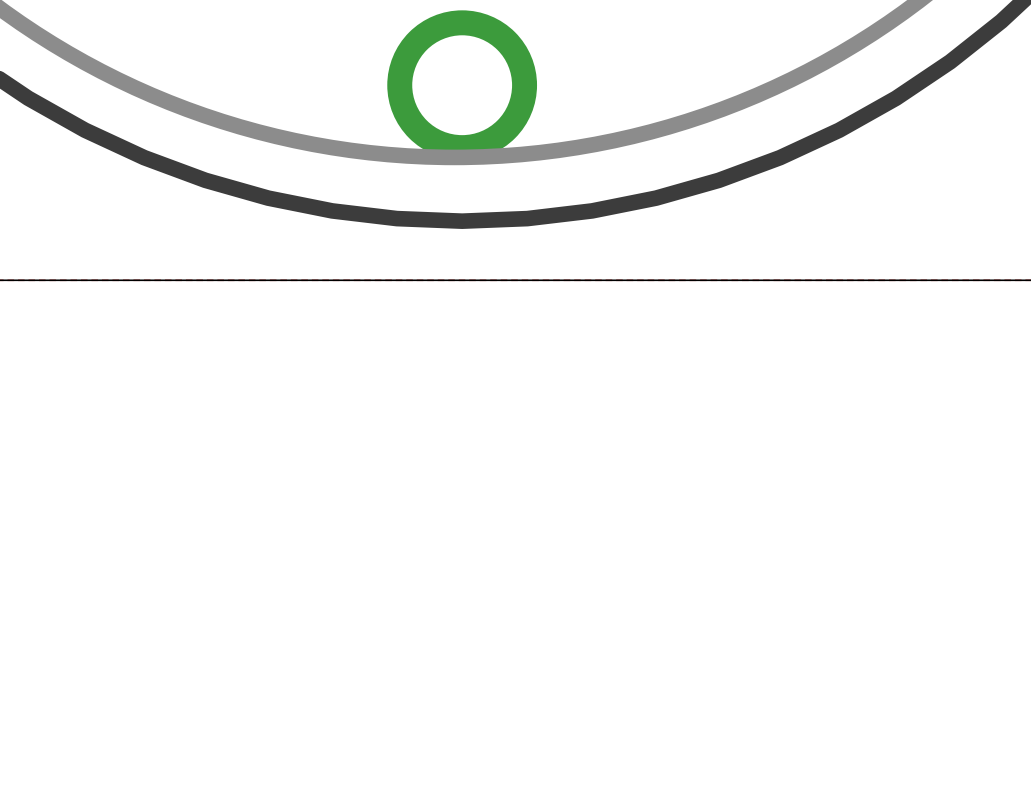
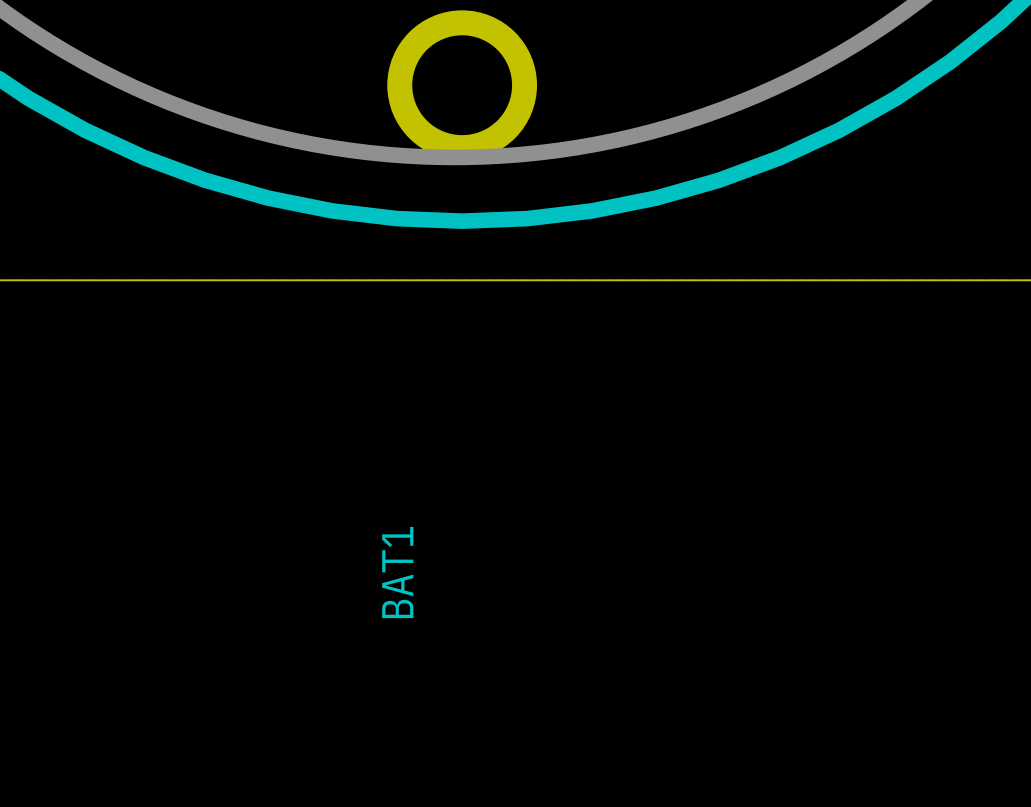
BAT1 name: none -> BAT1 (397, 572)

